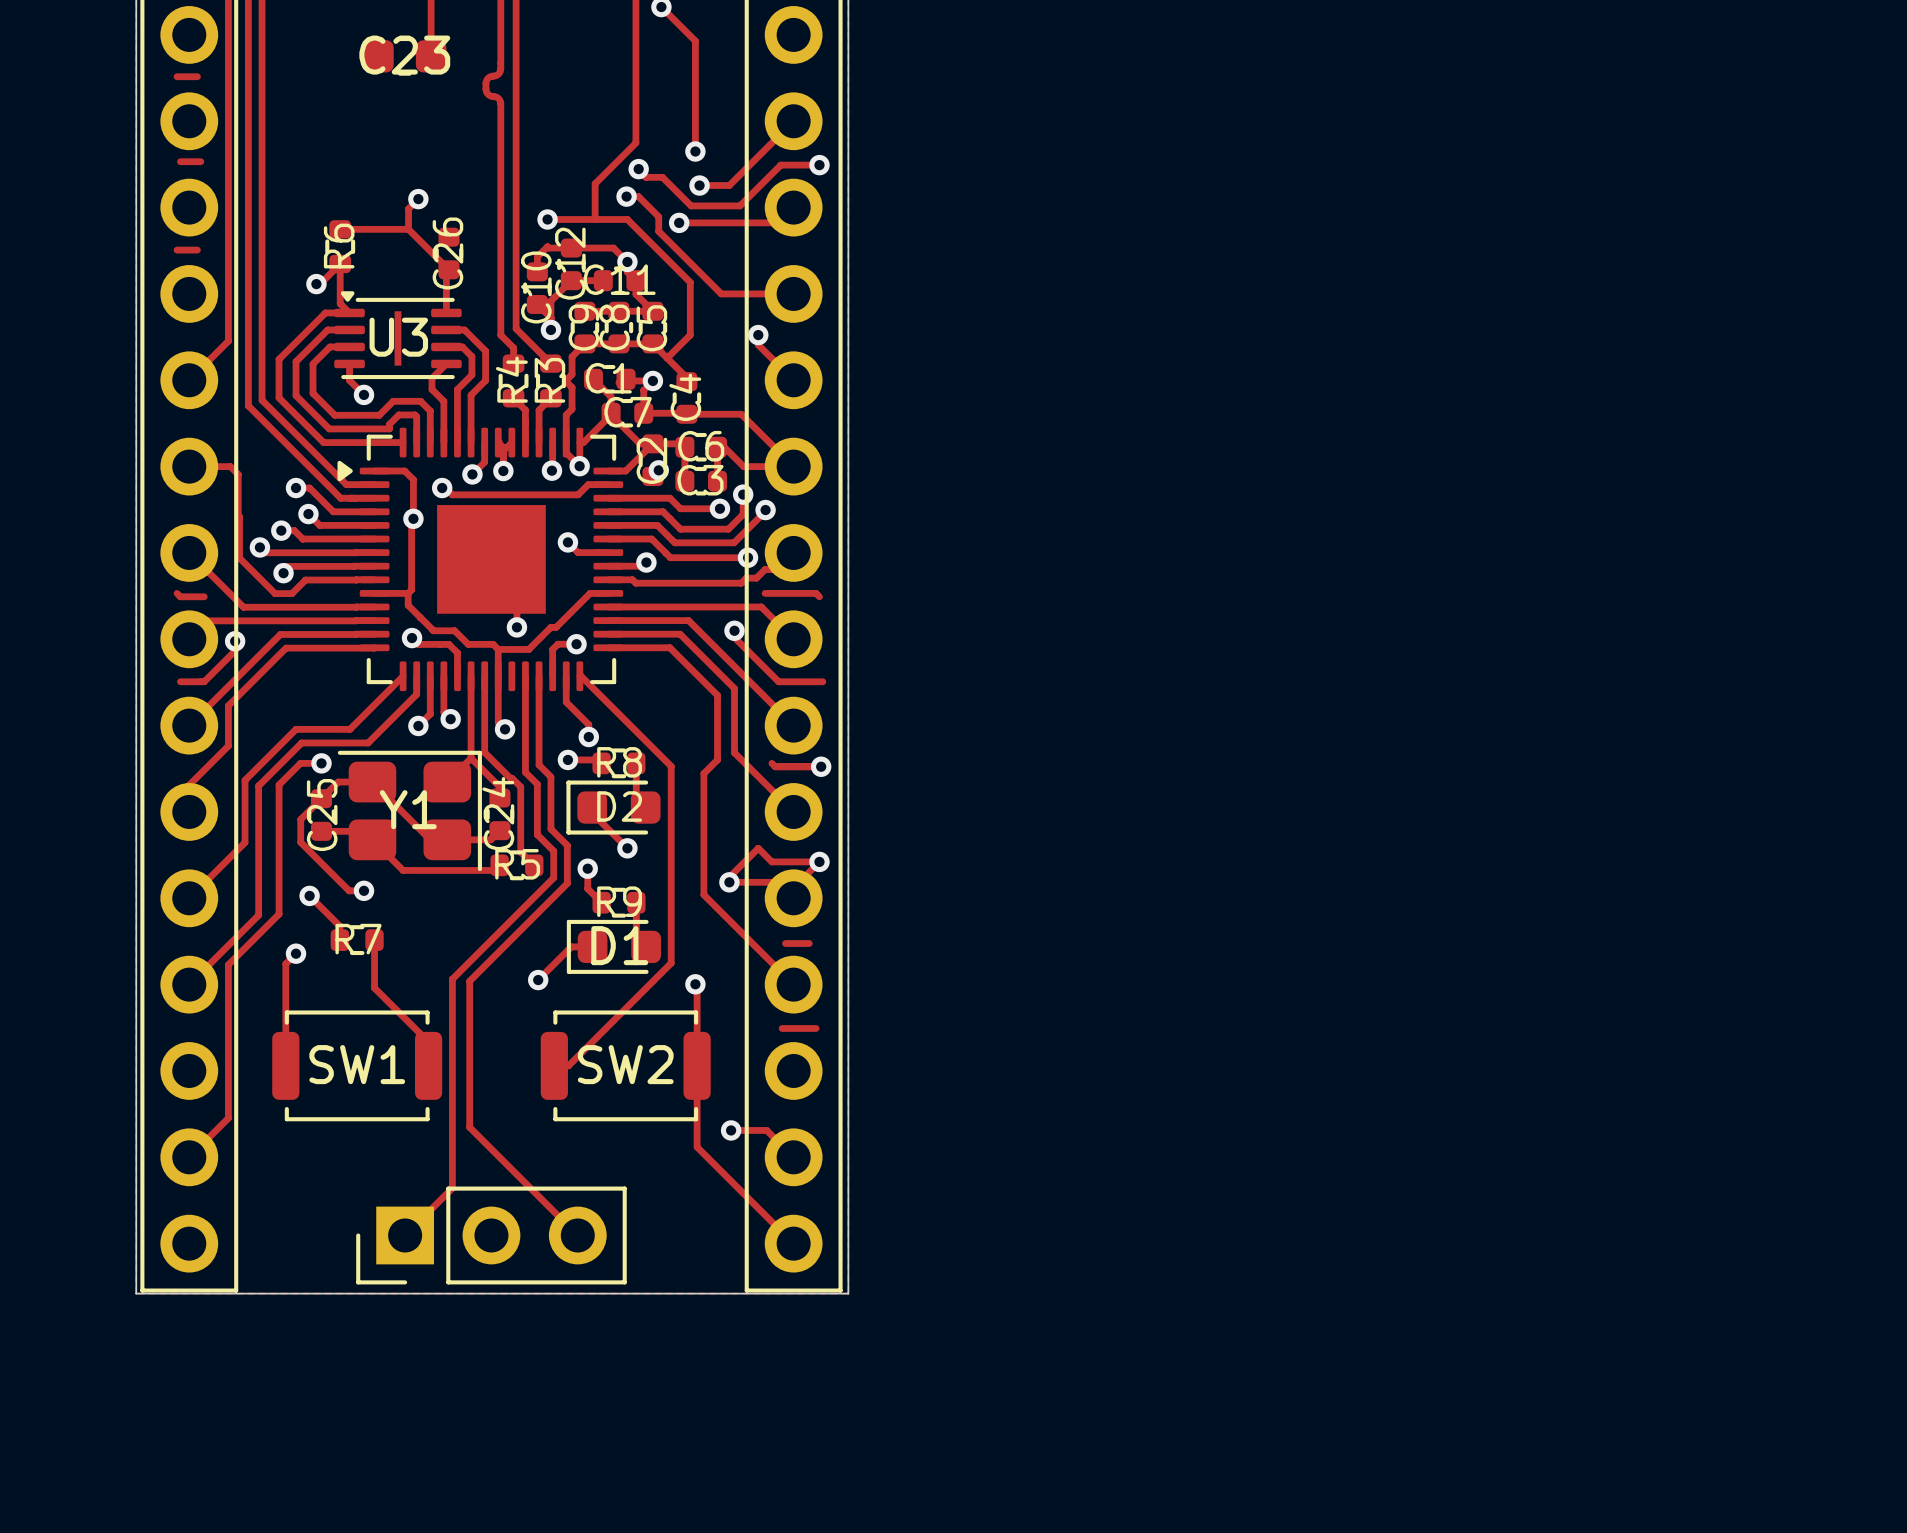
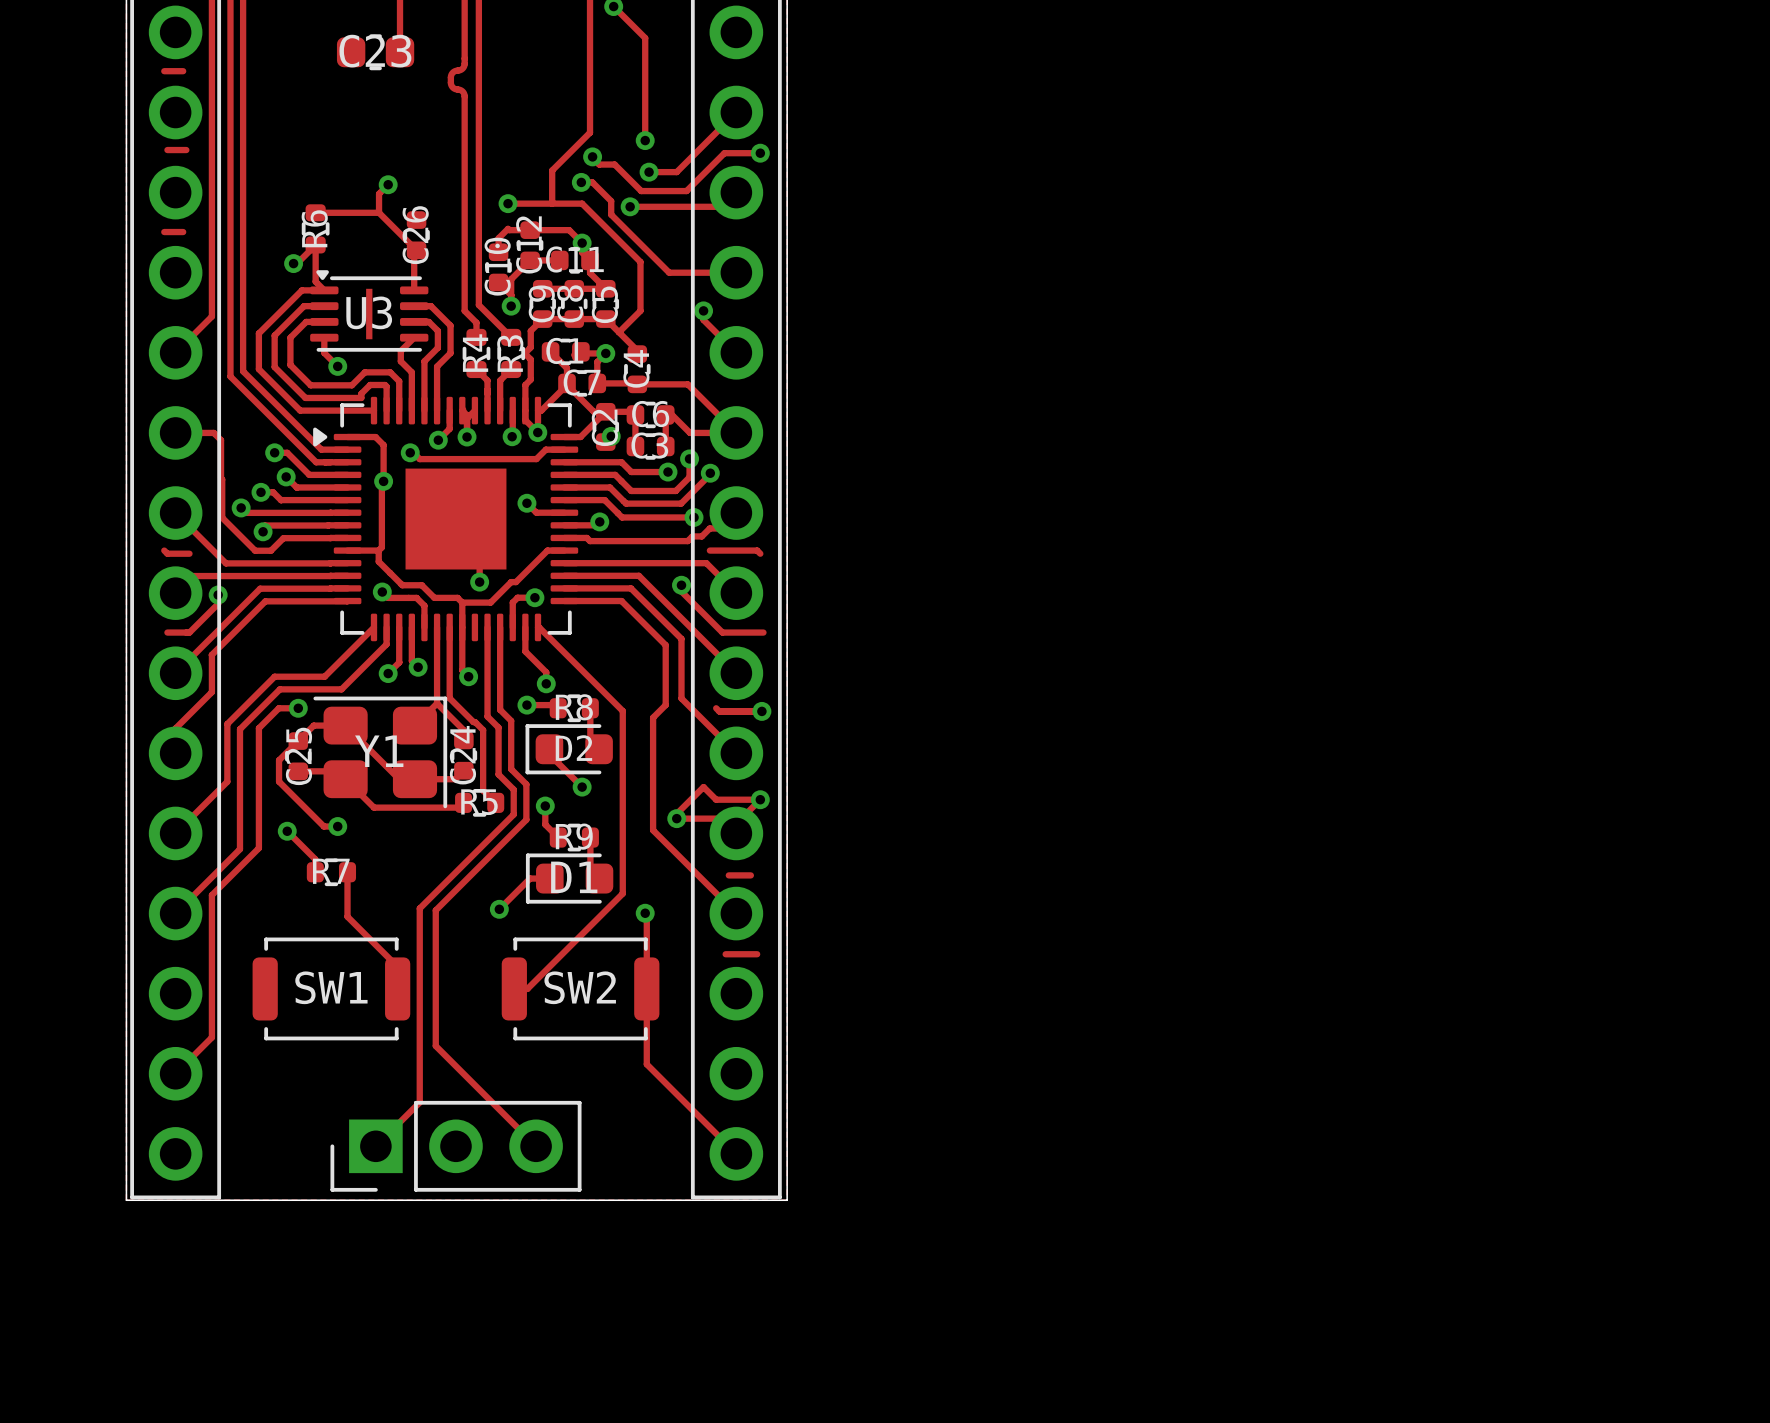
track: (296, 953) (285, 963) (285, 1065) -> none
via: (296, 953) -> none
track: (731, 1130) (766, 1130) (793, 1157) -> none
via: (731, 1130) -> none

